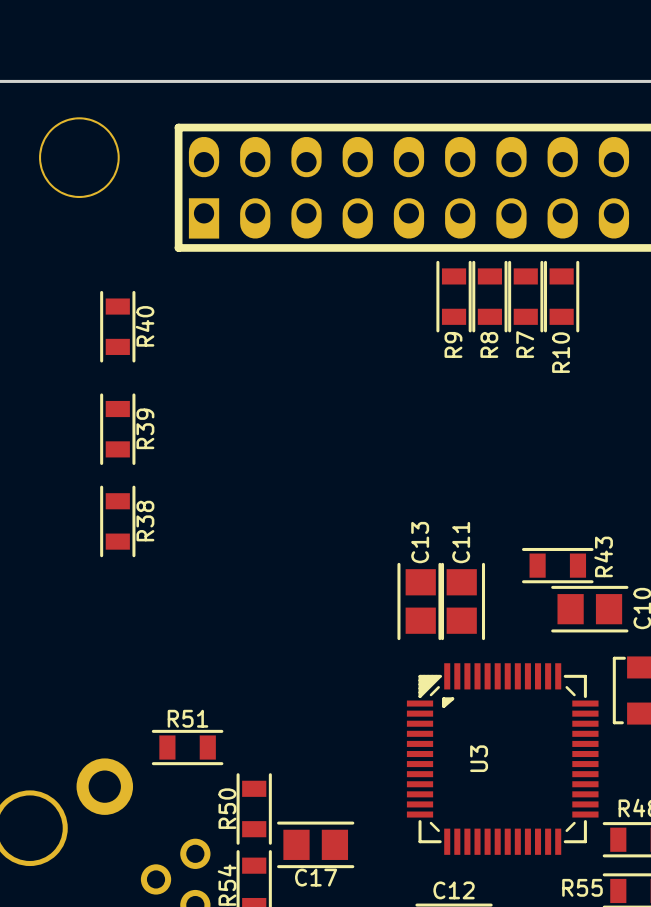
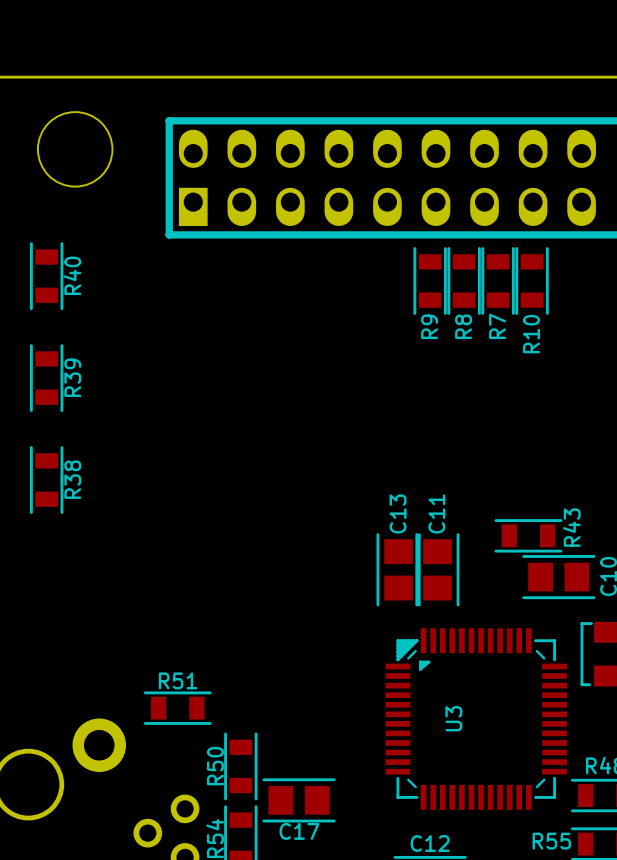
R40 position: (117, 326) -> (46, 276)
R39 position: (117, 429) -> (46, 378)
R38 position: (117, 521) -> (46, 480)

